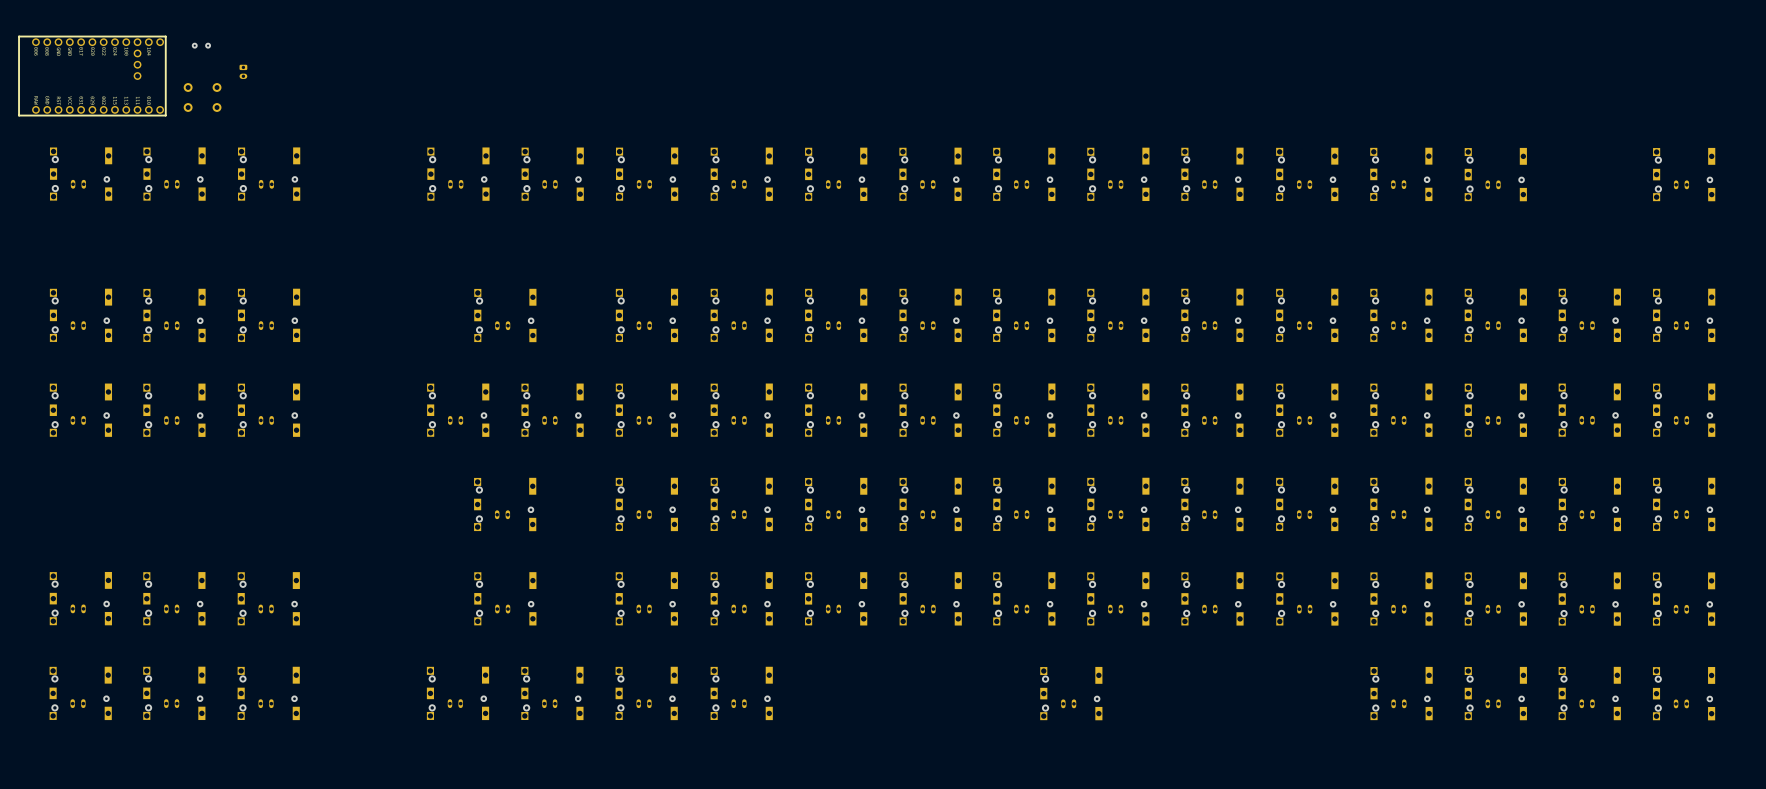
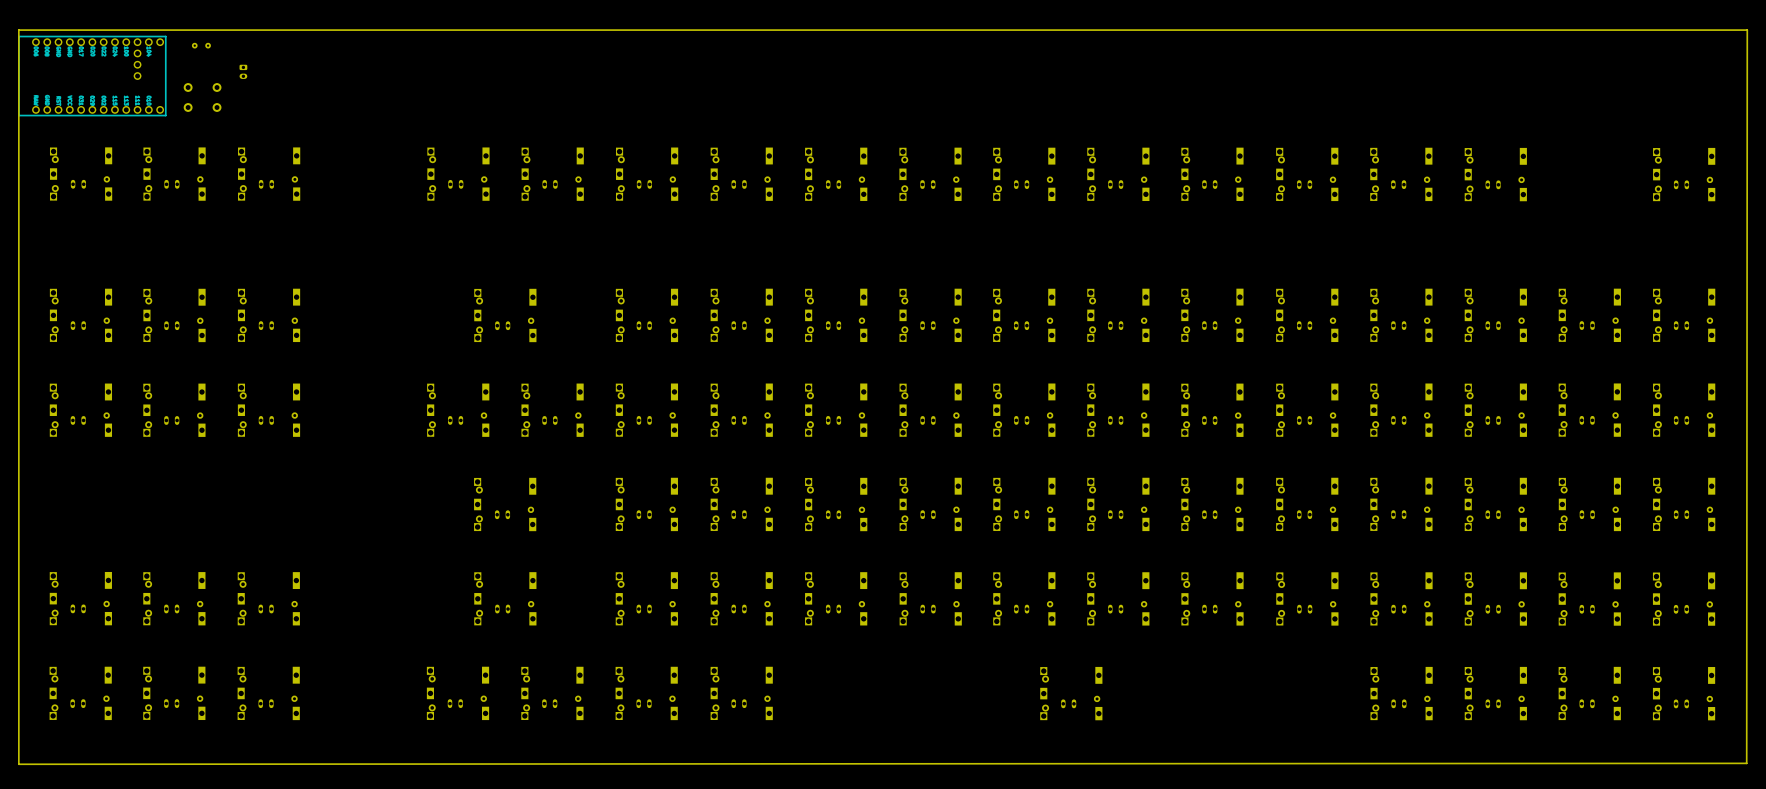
board edge: none -> (1747, 30) (1746, 763) (18, 764) (18, 30) (1747, 30)

